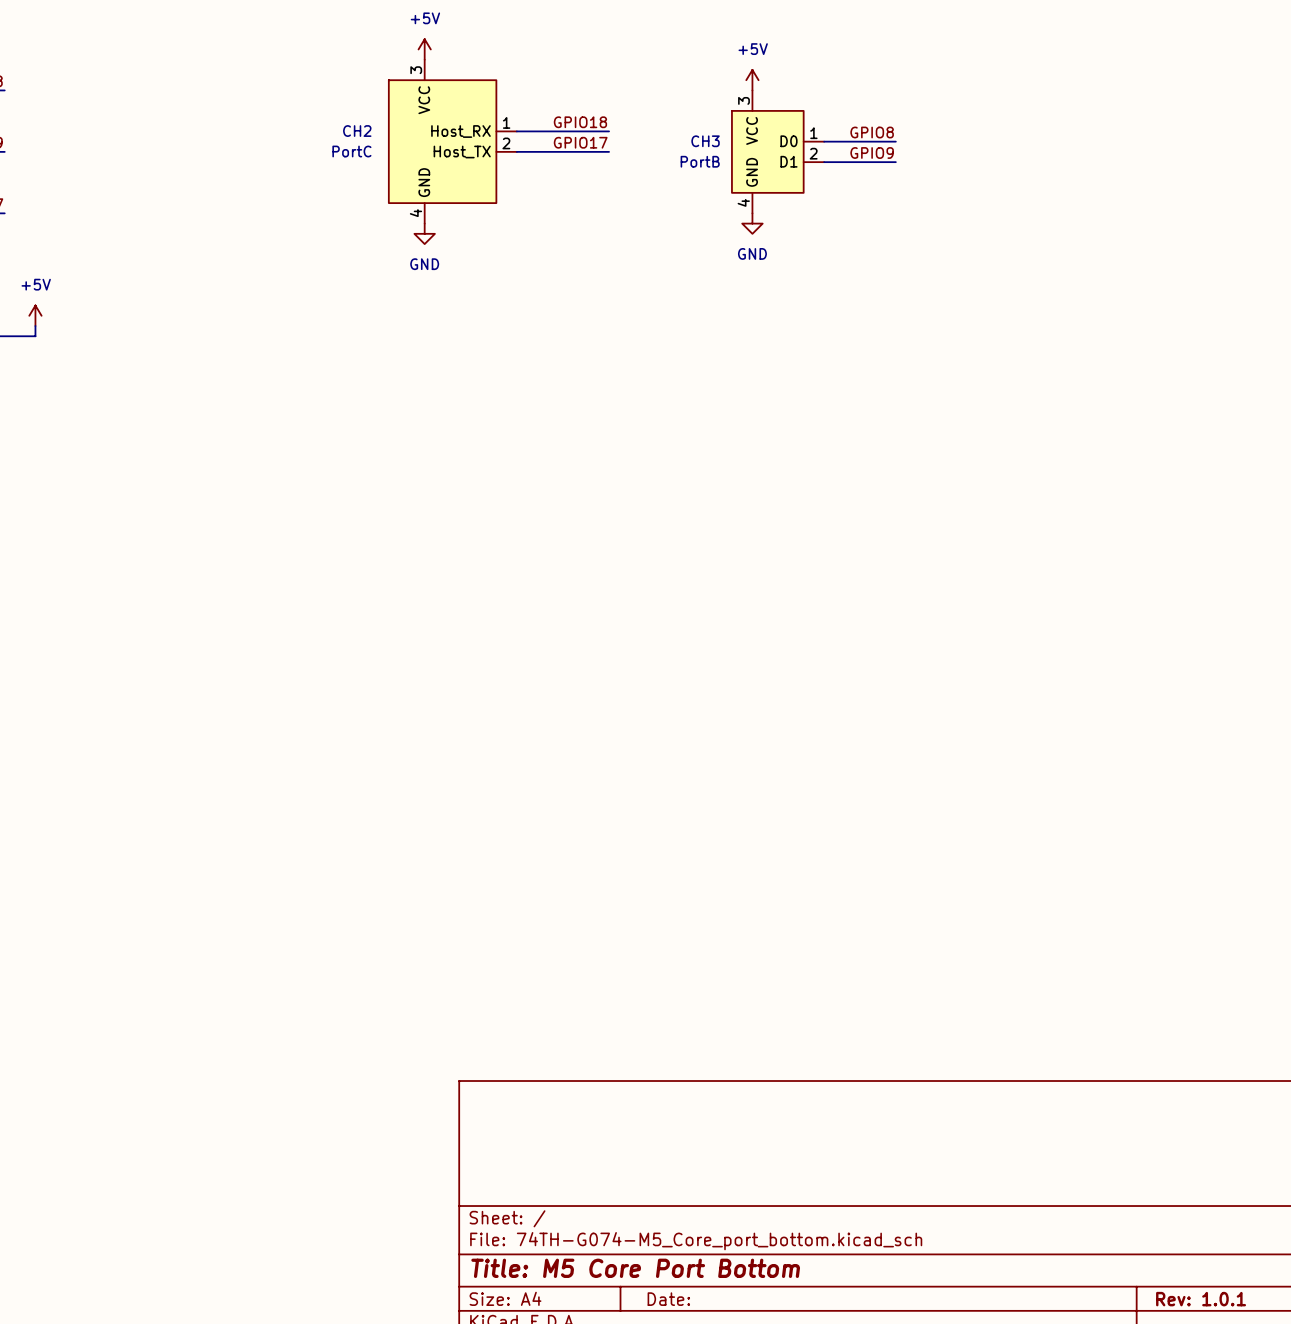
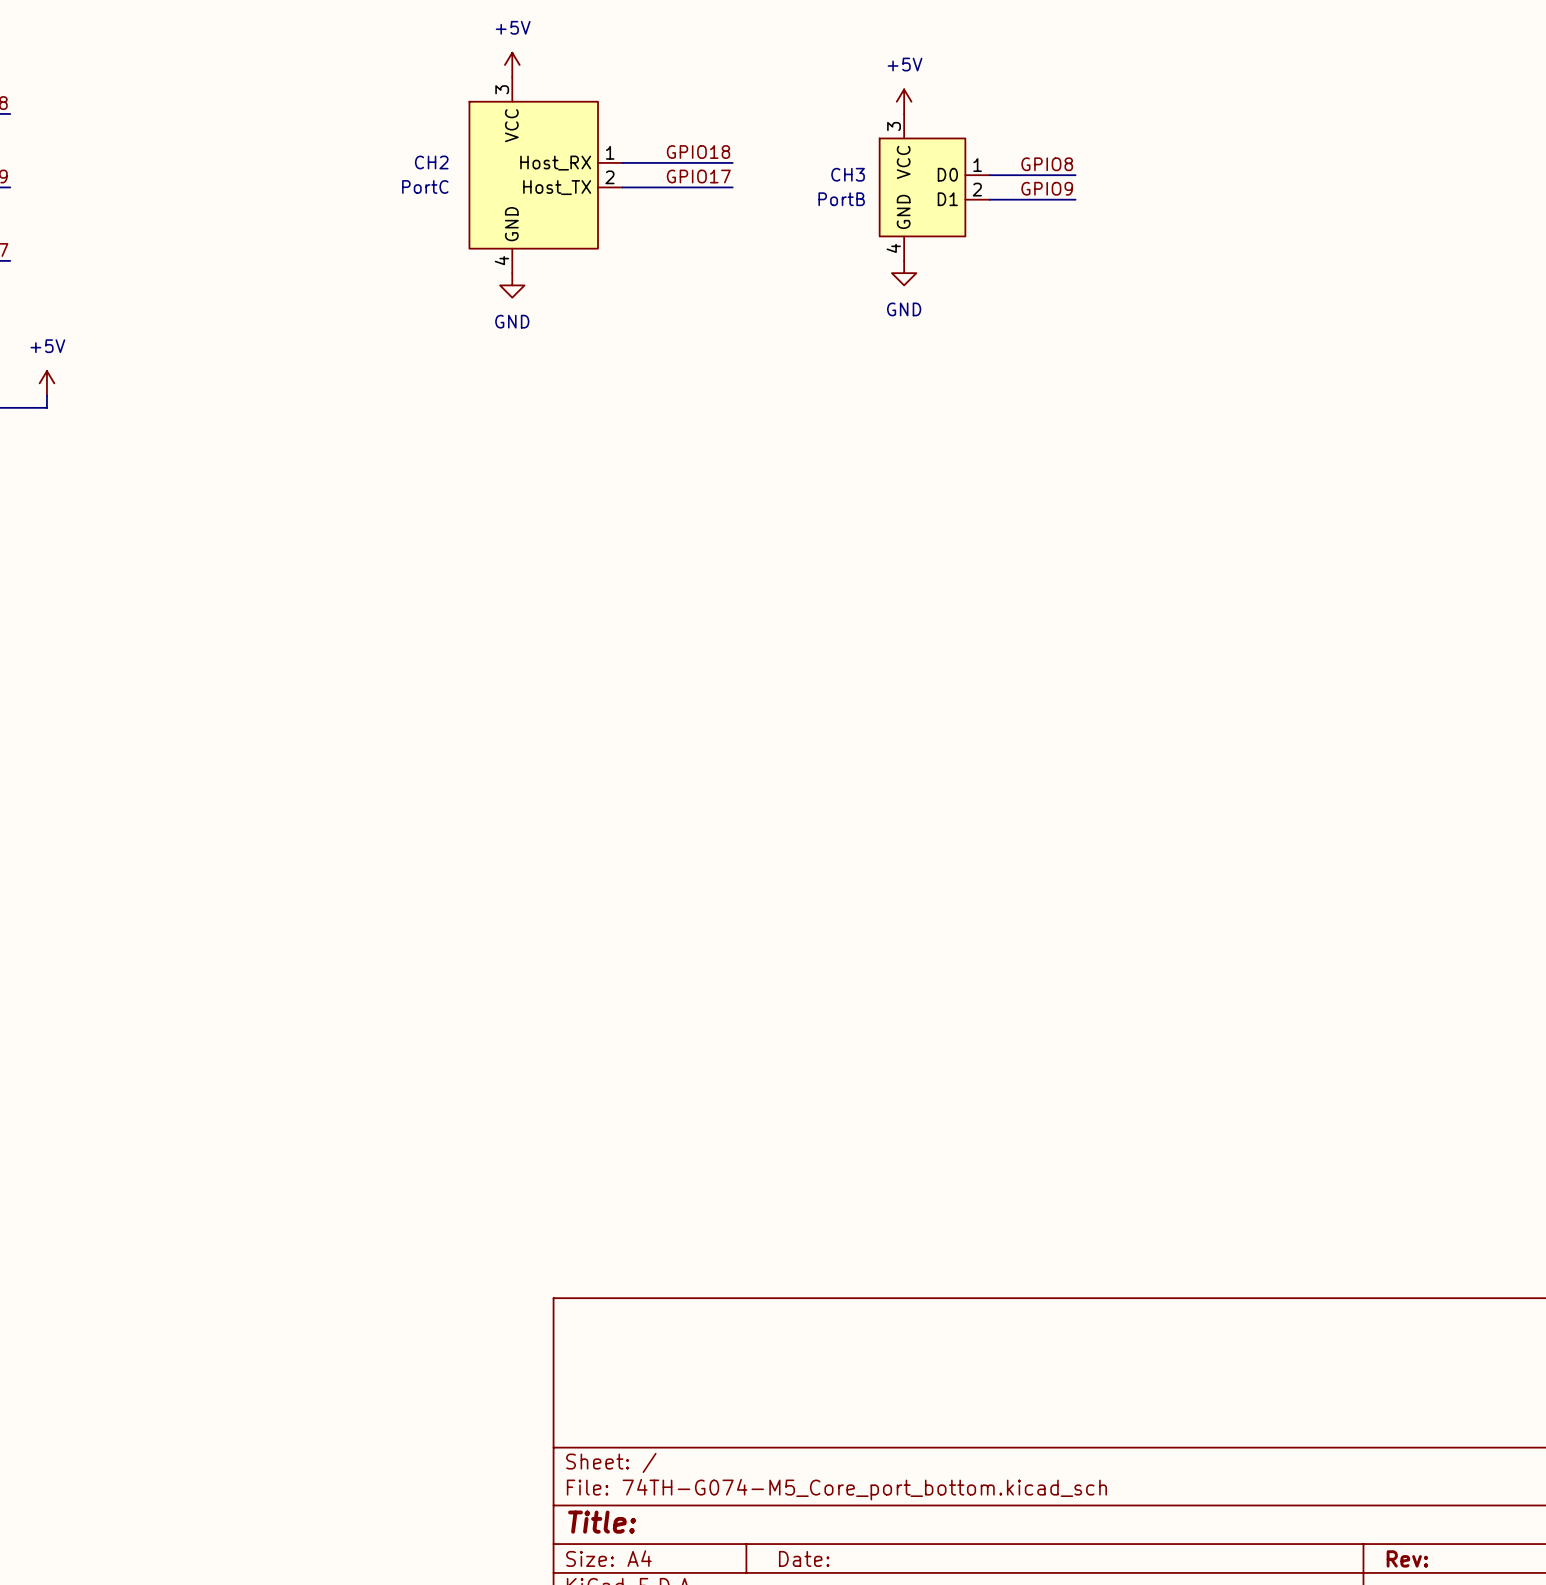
title block: Title: M5 Core Port Bottom (635, 1268) -> Title: (602, 1522)
title block: Rev: 1.0.1 (1201, 1299) -> Rev: (1407, 1558)

